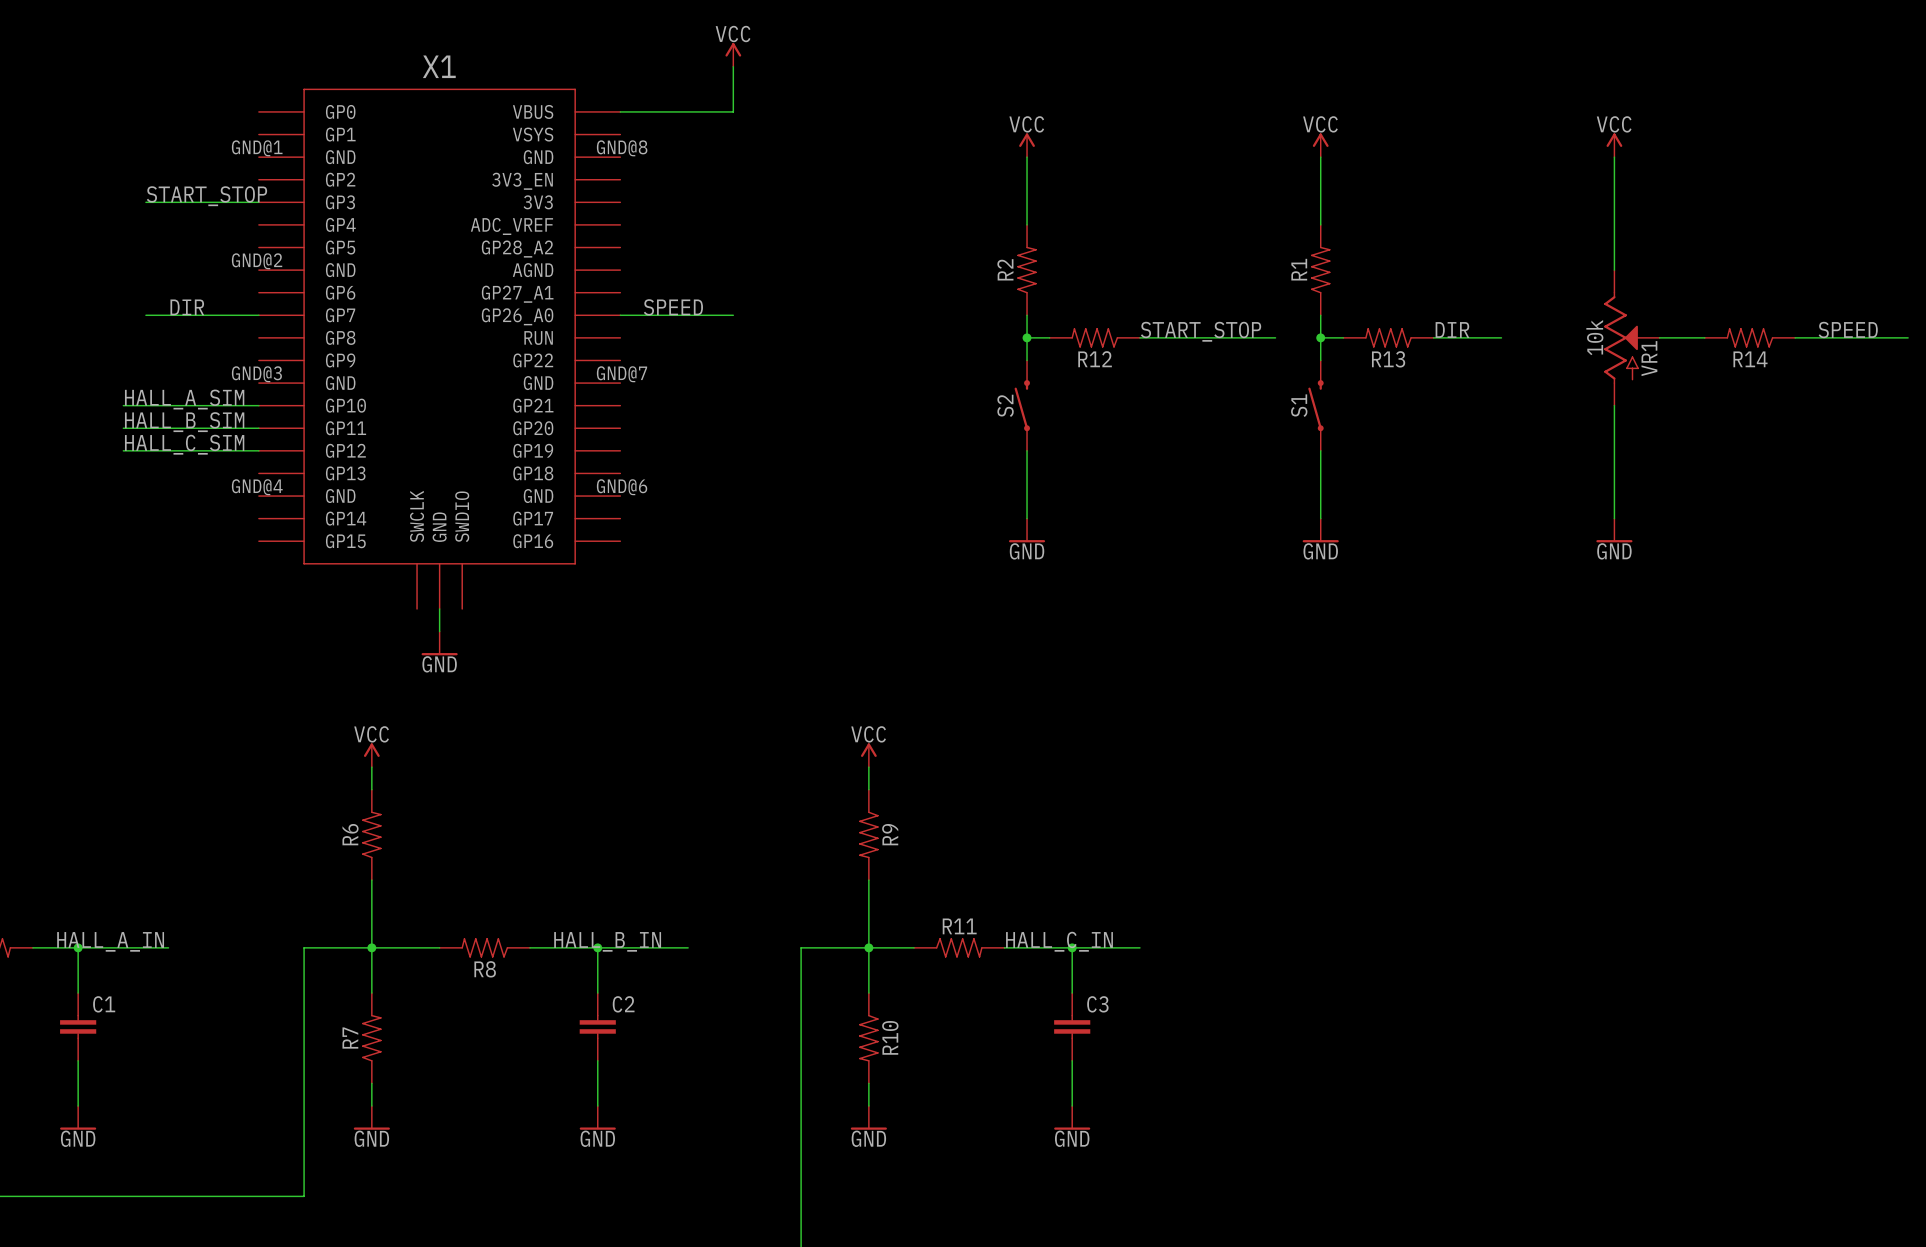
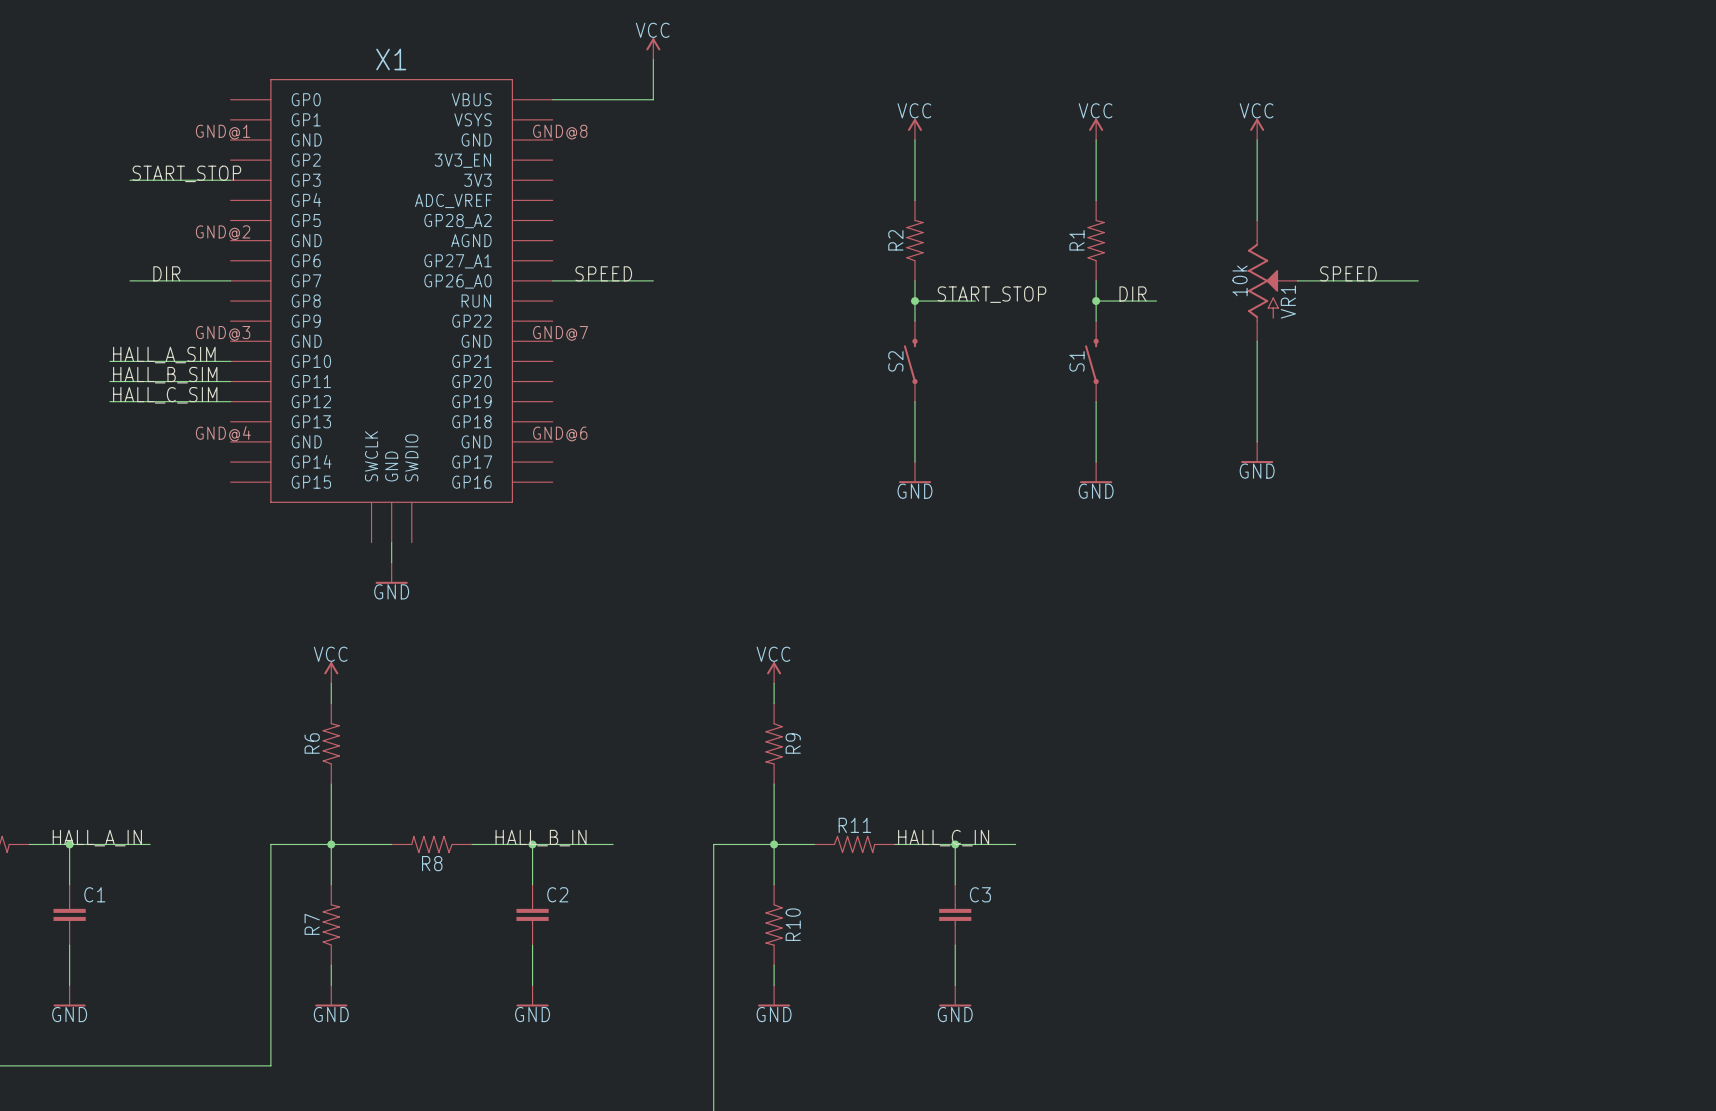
power symbol: none -> VCC (1096, 129)
power symbol: VCC (1320, 145) -> none
power symbol: none -> VCC (1257, 129)
power symbol: VCC (1614, 145) -> none
wire: (1320, 157) (1320, 224) -> (1096, 140) (1096, 200)
wire: none -> (1257, 140) (1257, 220)
wire: (1614, 157) (1614, 270) -> none
R1 position: (1320, 270) -> (1096, 240)
label: none -> SPEED (1348, 273)
wire: (1320, 315) (1320, 360) -> (1096, 280) (1096, 321)
wire: none -> (1297, 280) (1418, 280)
label position: DIR (1452, 329) -> DIR (1133, 293)
label: SPEED (1848, 329) -> none
label position: START_STOP (1201, 331) -> START_STOP (992, 294)
R12: (1094, 337) -> none
wire: (1139, 337) (1230, 337) -> none
junction: none -> (1096, 301)
wire: (1320, 337) (1343, 337) -> (1136, 301) (1156, 301)
junction: (1320, 337) -> none
R13: (1388, 337) -> none
wire: (1433, 337) (1501, 337) -> none
VR1 position: (1631, 337) -> (1272, 280)
wire: (1659, 337) (1704, 337) -> none
R14: (1749, 337) -> none
wire: (1795, 337) (1908, 337) -> none
S1 position: (1315, 405) -> (1091, 361)
wire: (1614, 405) (1614, 518) -> (1257, 341) (1257, 441)
wire: (1320, 450) (1320, 518) -> (1096, 401) (1096, 462)
power symbol: none -> GND (1257, 452)
power symbol: none -> GND (1096, 472)
power symbol: GND (1320, 530) -> none
power symbol: GND (1614, 530) -> none

